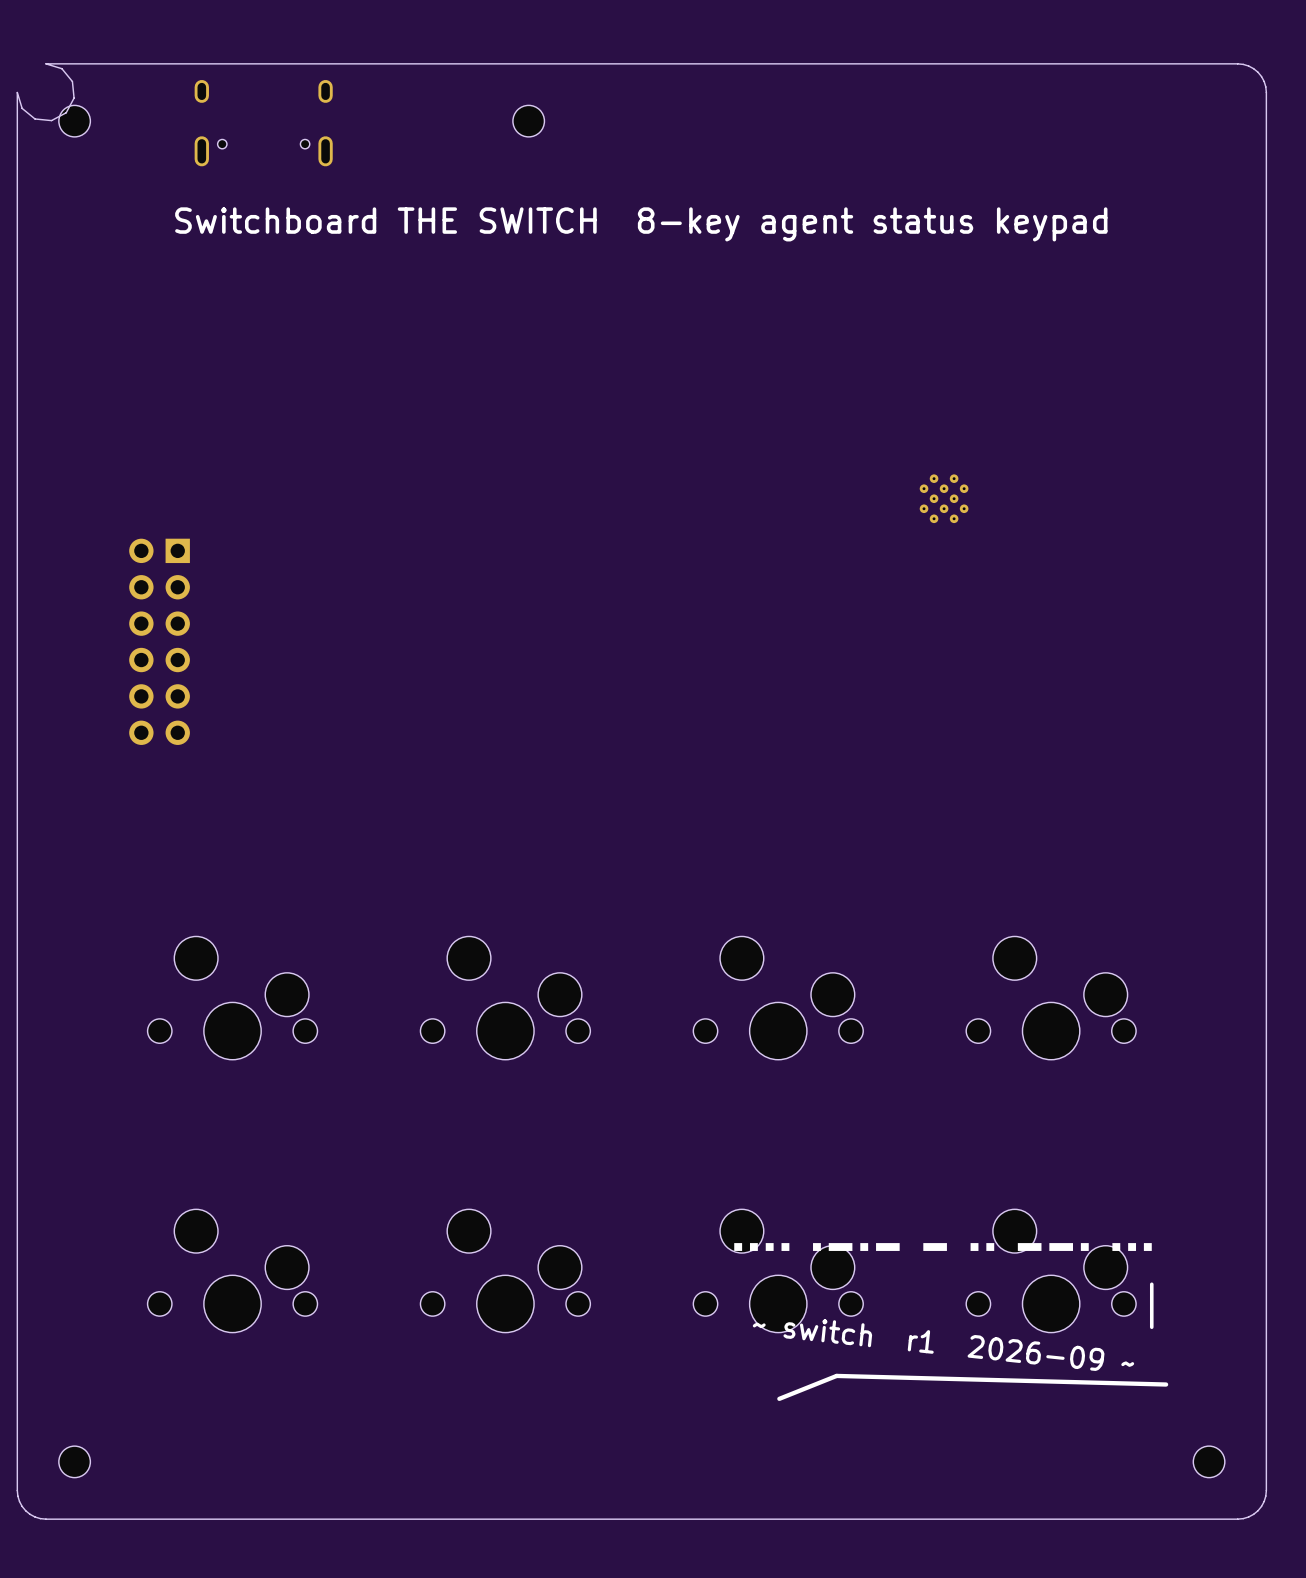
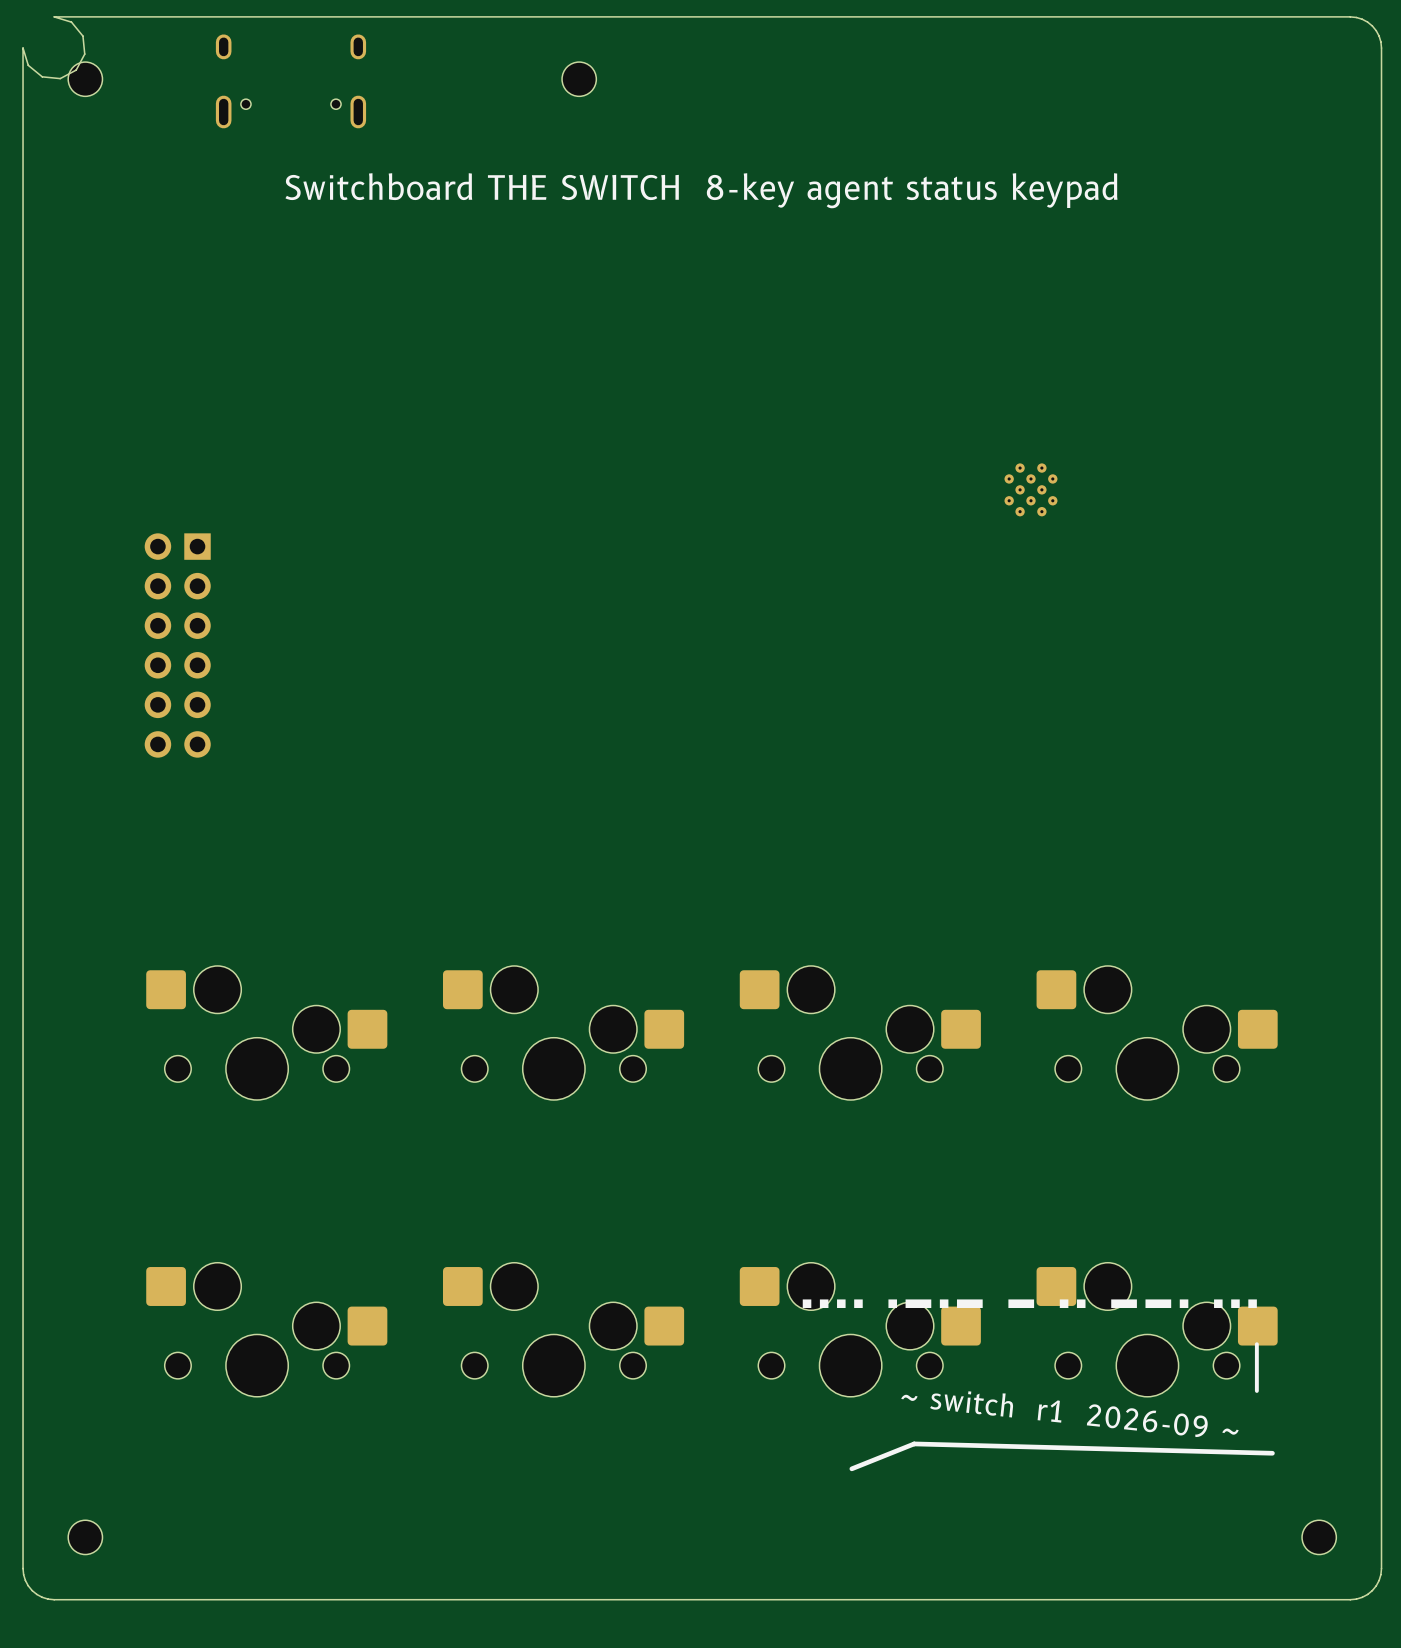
part footprint: [147, 936, 318, 1060] -> [146, 965, 388, 1101]
part footprint: [420, 936, 591, 1060] -> [443, 965, 685, 1101]
part footprint: [693, 936, 864, 1060] -> [739, 965, 981, 1101]
part footprint: [966, 936, 1137, 1060] -> [1036, 965, 1278, 1101]
part footprint: [147, 1209, 318, 1333] -> [146, 1262, 388, 1397]
part footprint: [420, 1209, 591, 1333] -> [443, 1262, 685, 1397]
part footprint: [693, 1209, 864, 1333] -> [739, 1262, 981, 1397]
part footprint: [966, 1209, 1137, 1333] -> [1036, 1262, 1278, 1397]

